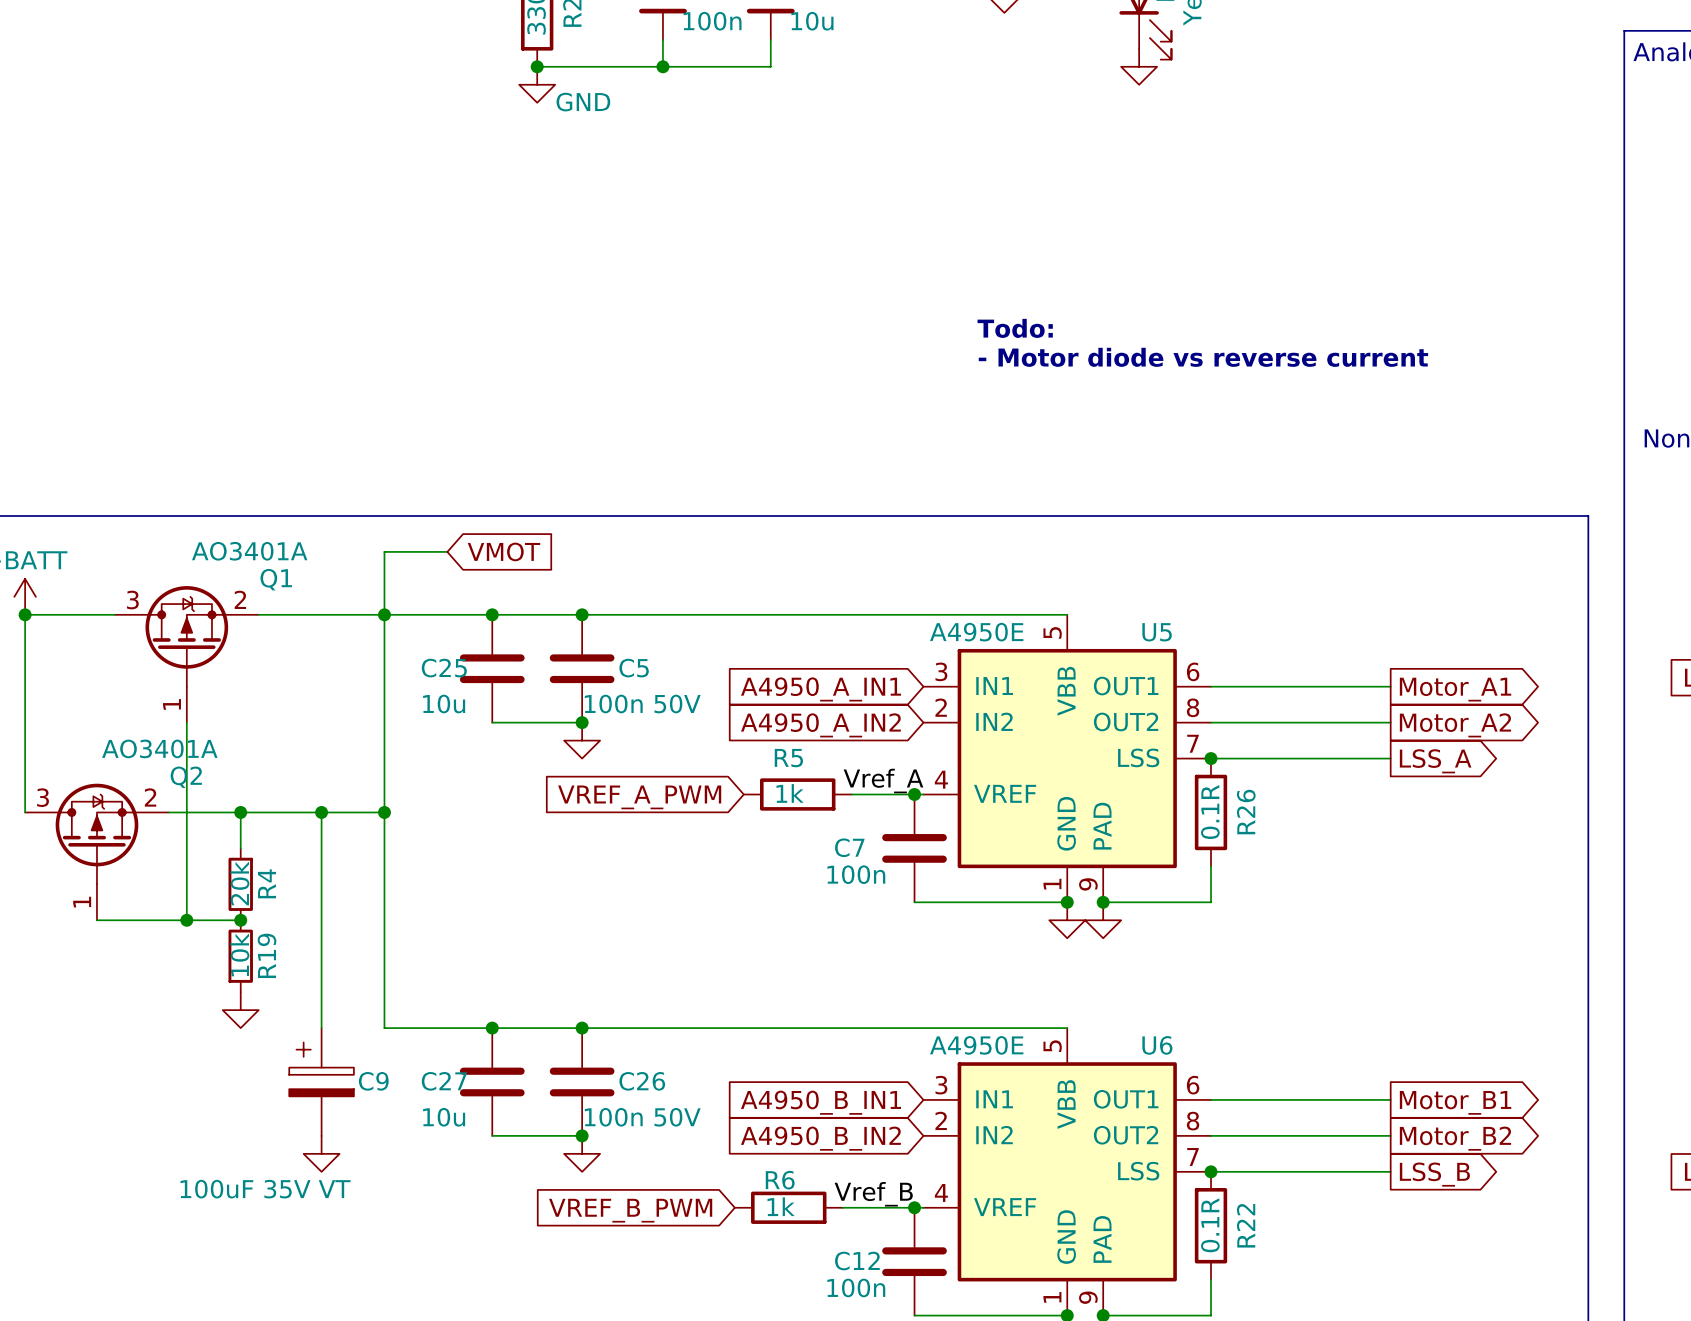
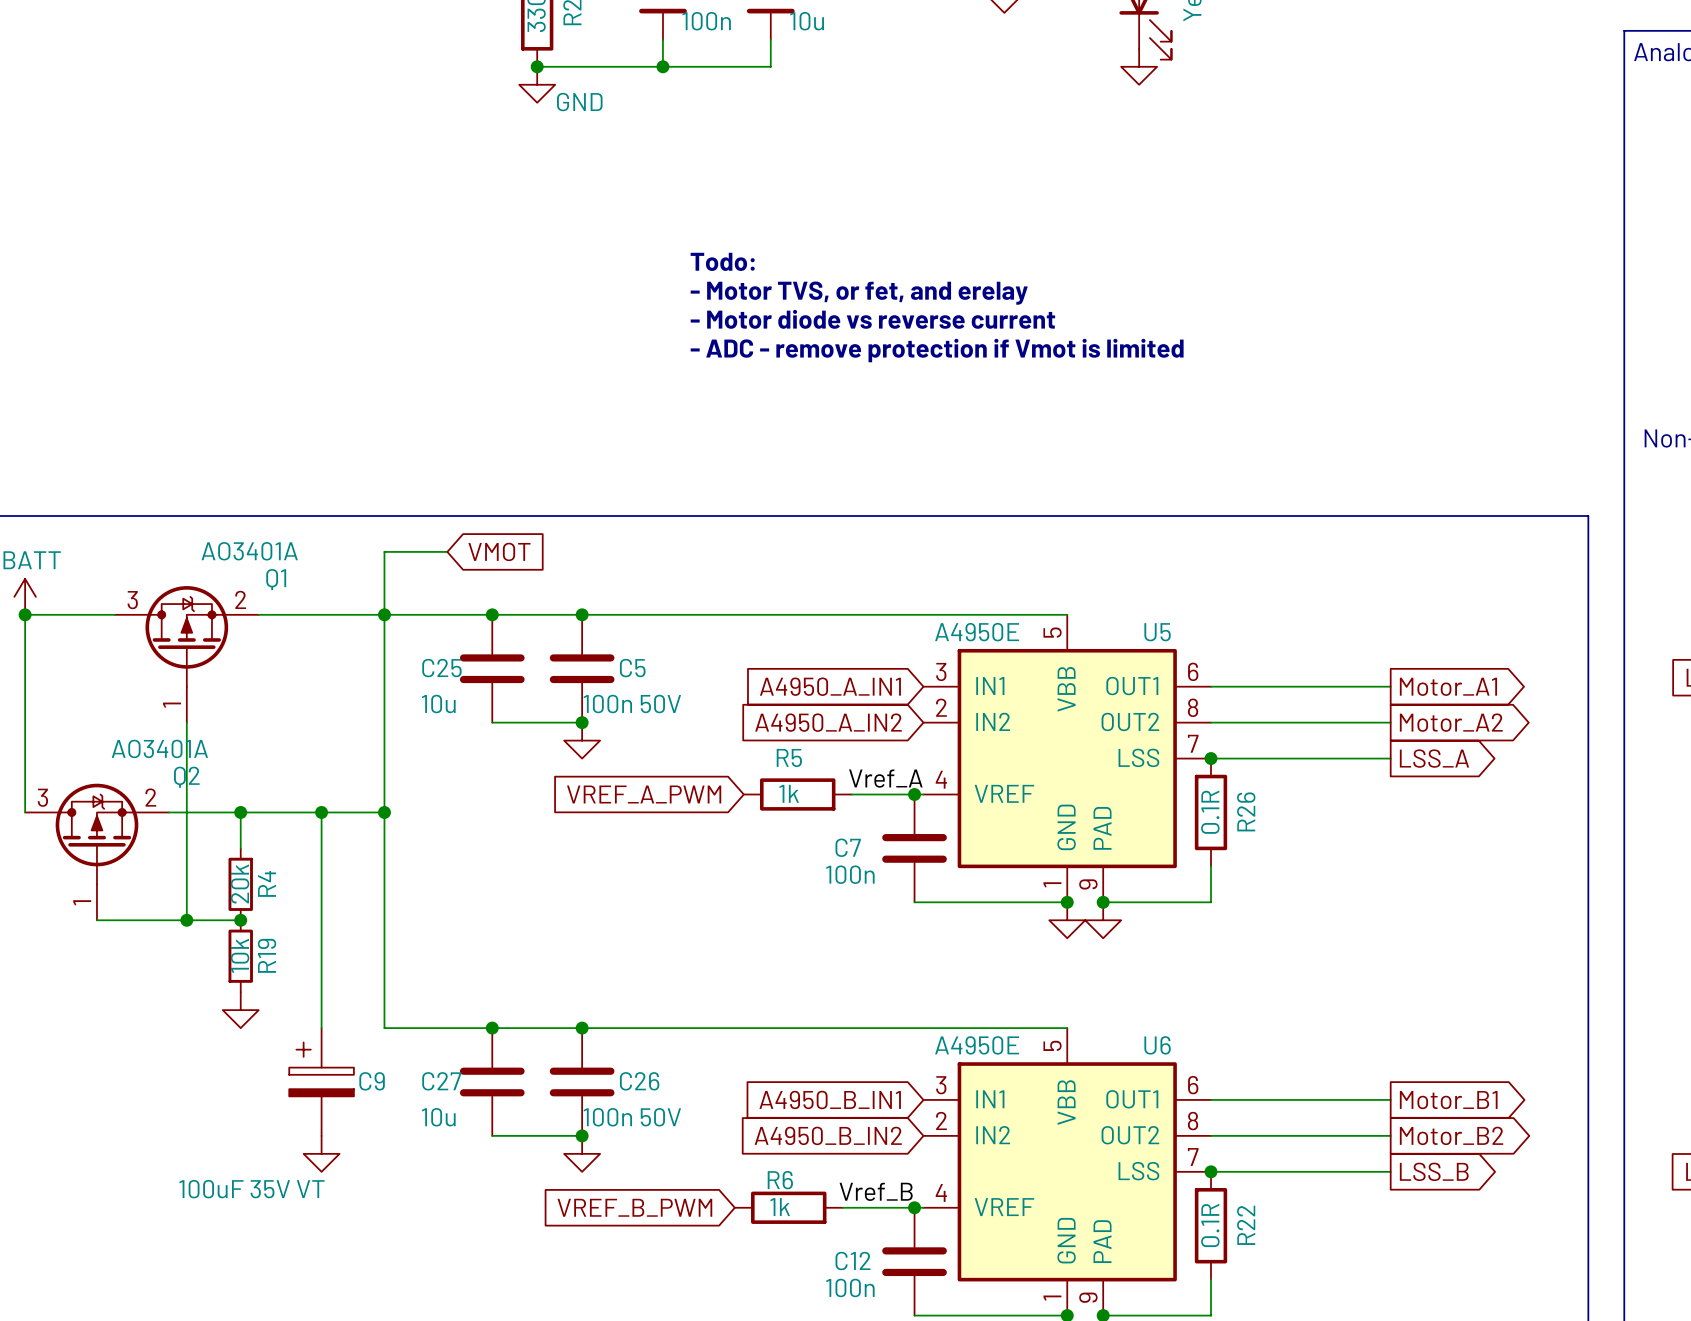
text: none -> - Motor TVS, or fet, and erelay (859, 293)
text position: Todo: (1015, 328) -> Todo: (722, 261)
text: none -> - ADC - remove protection if Vmot is limited (937, 350)
text position: - Motor diode vs reverse current (1203, 357) -> - Motor diode vs reverse current (872, 319)

